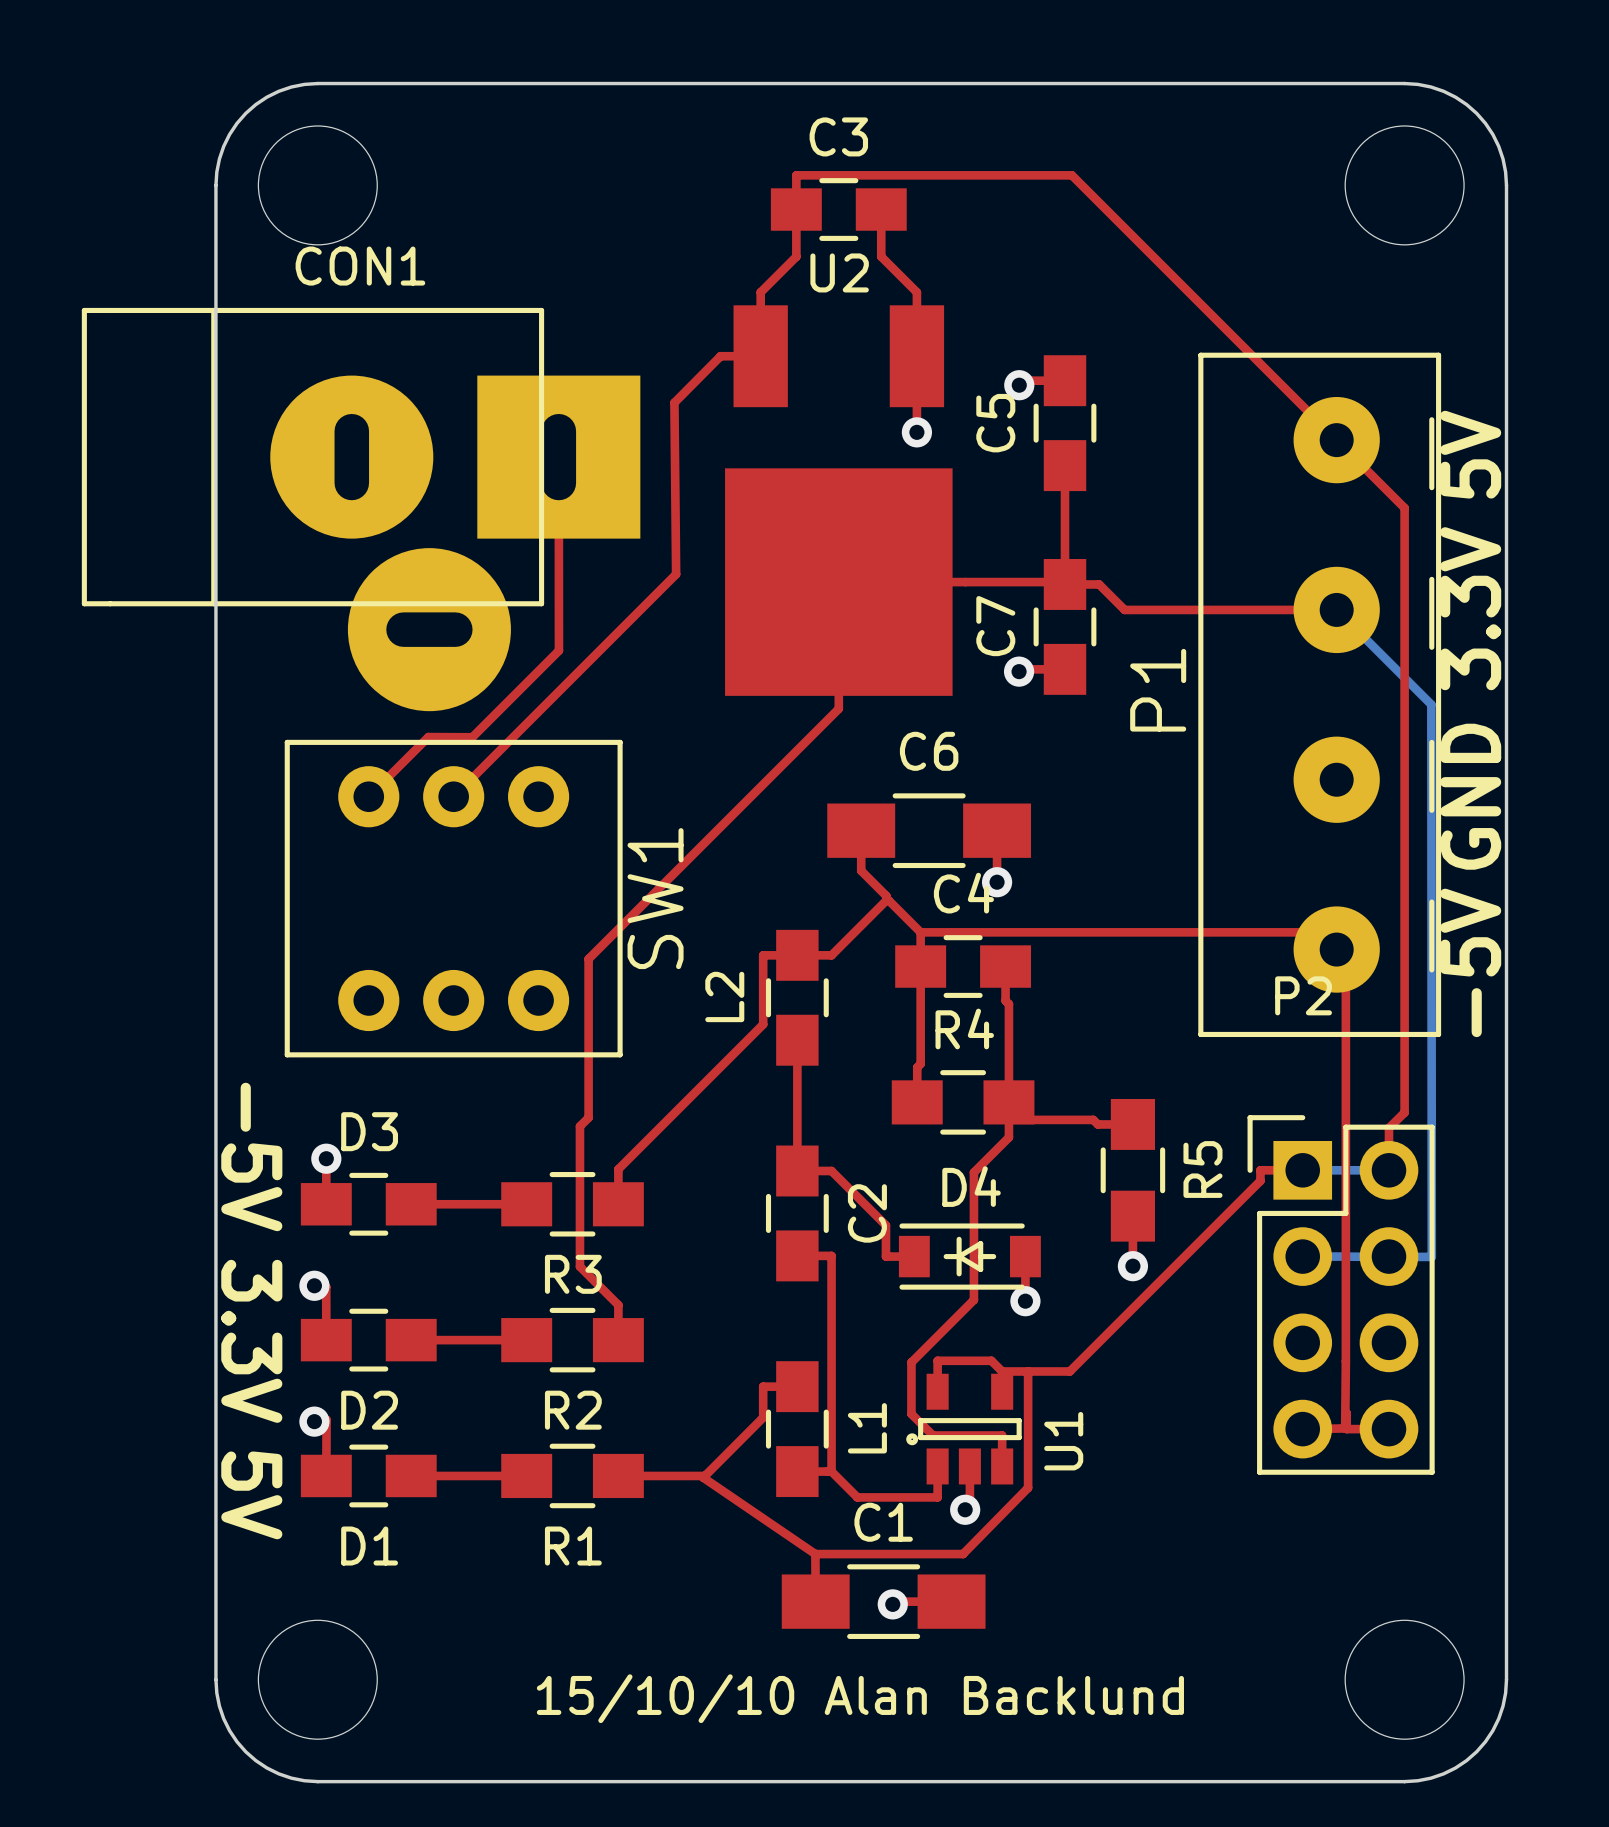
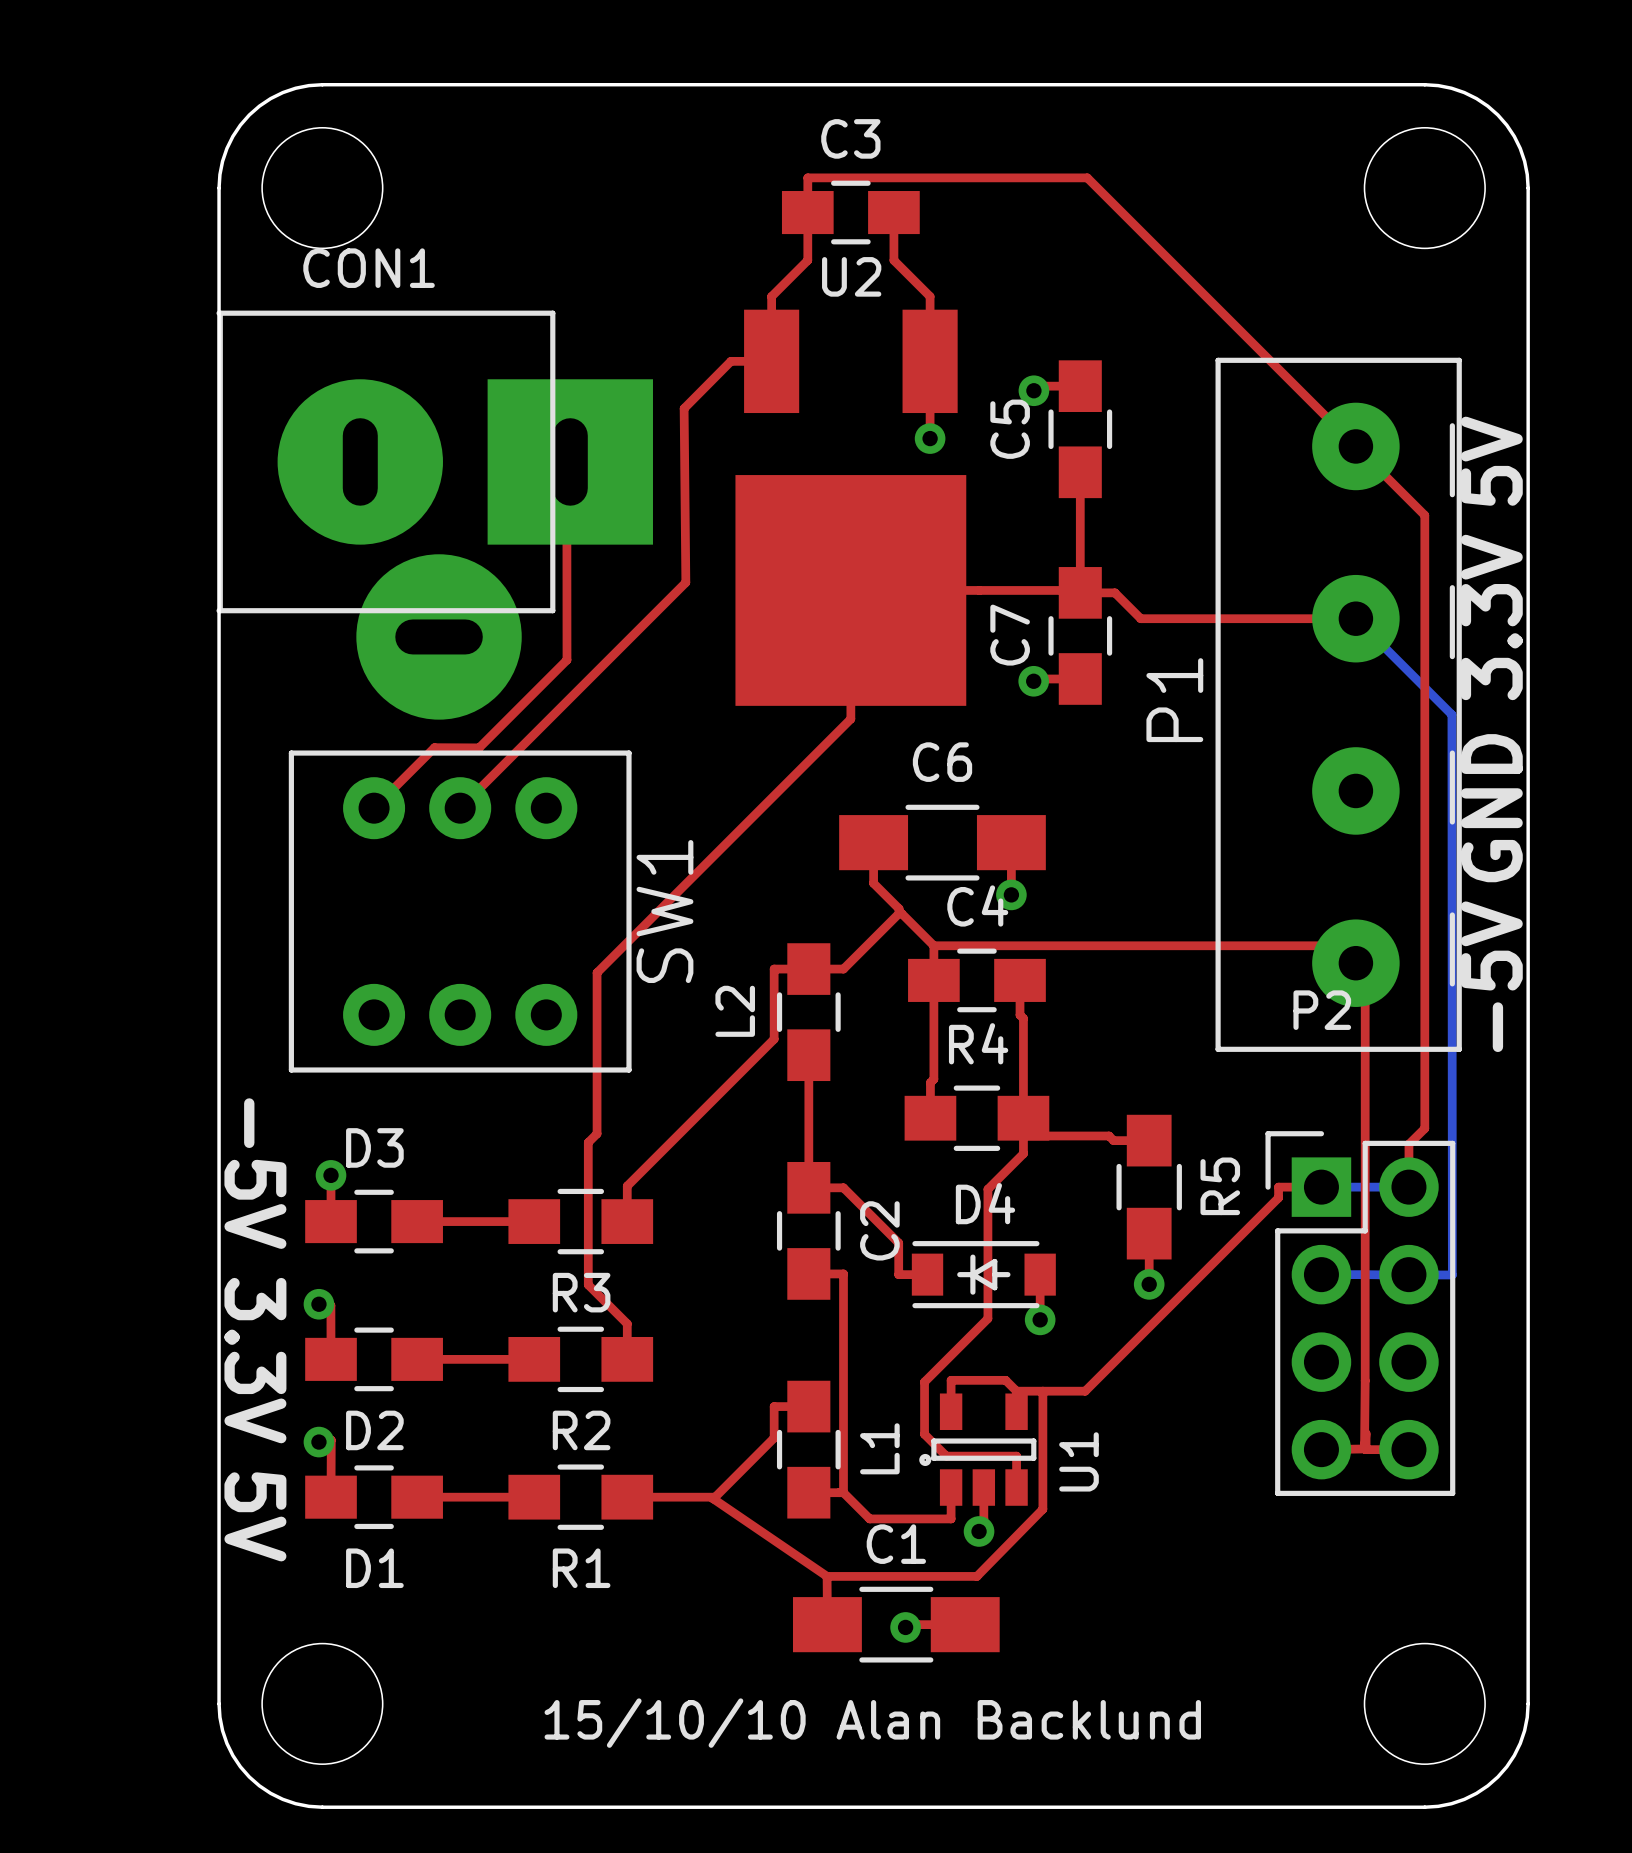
CON1 footprint: [81, 307, 641, 712] -> [216, 310, 653, 720]

